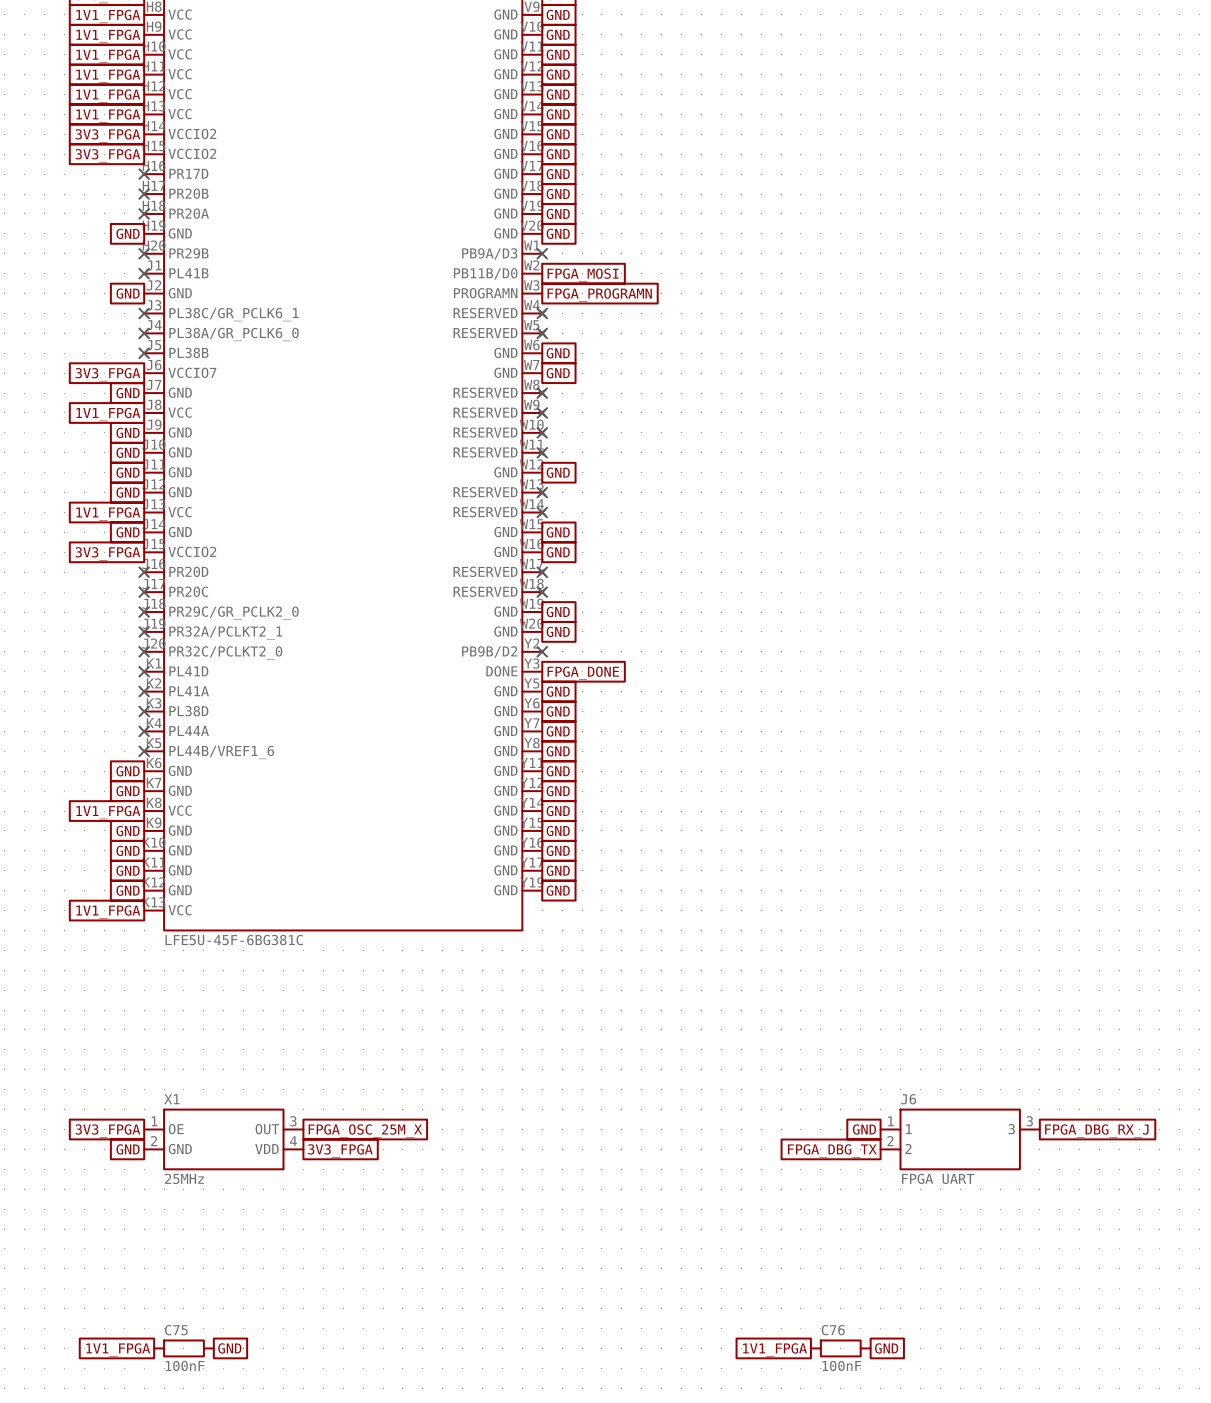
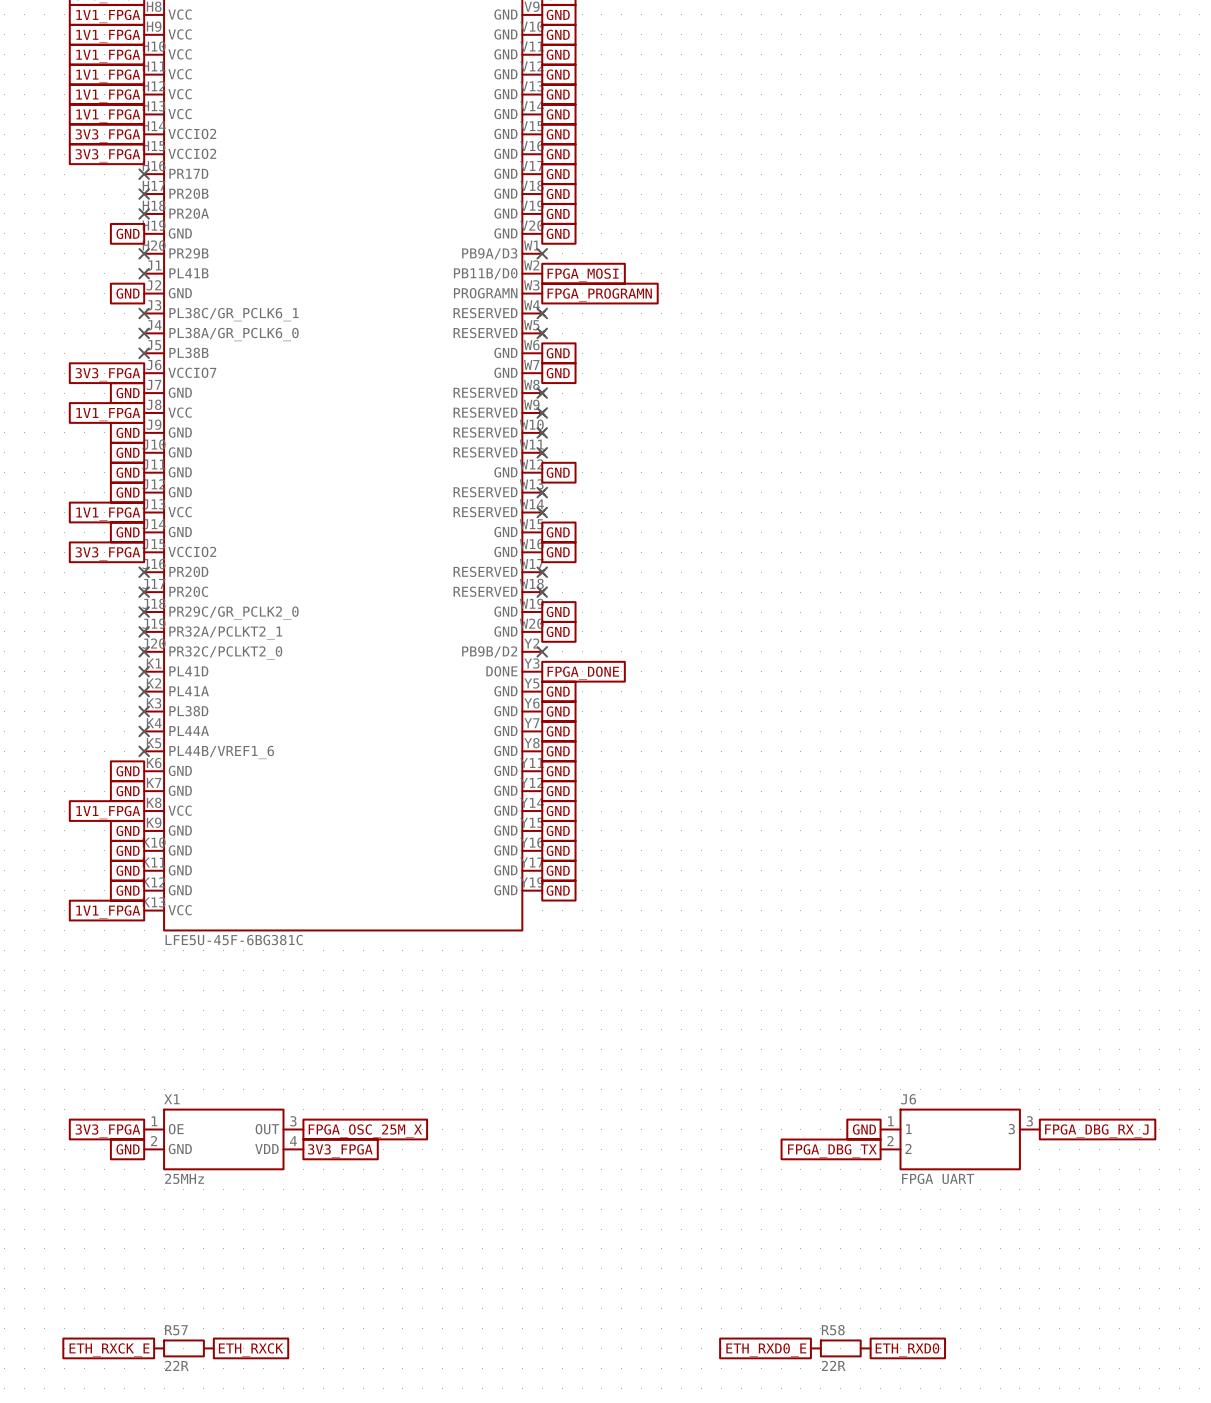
C75 name: C75 (176, 1330) -> R57 (176, 1330)
C76 name: C76 (833, 1330) -> R58 (833, 1330)
global label: GND (229, 1348) -> ETH_RXCK (251, 1349)
global label: GND (886, 1348) -> ETH_RXD0 (907, 1349)
global label: 1V1_FPGA (118, 1349) -> ETH_RXCK_E (109, 1349)
global label: 1V1_FPGA (775, 1349) -> ETH_RXD0_E (766, 1349)
C75 value: 100nF (185, 1365) -> 22R (176, 1365)
C76 value: 100nF (841, 1365) -> 22R (833, 1365)

